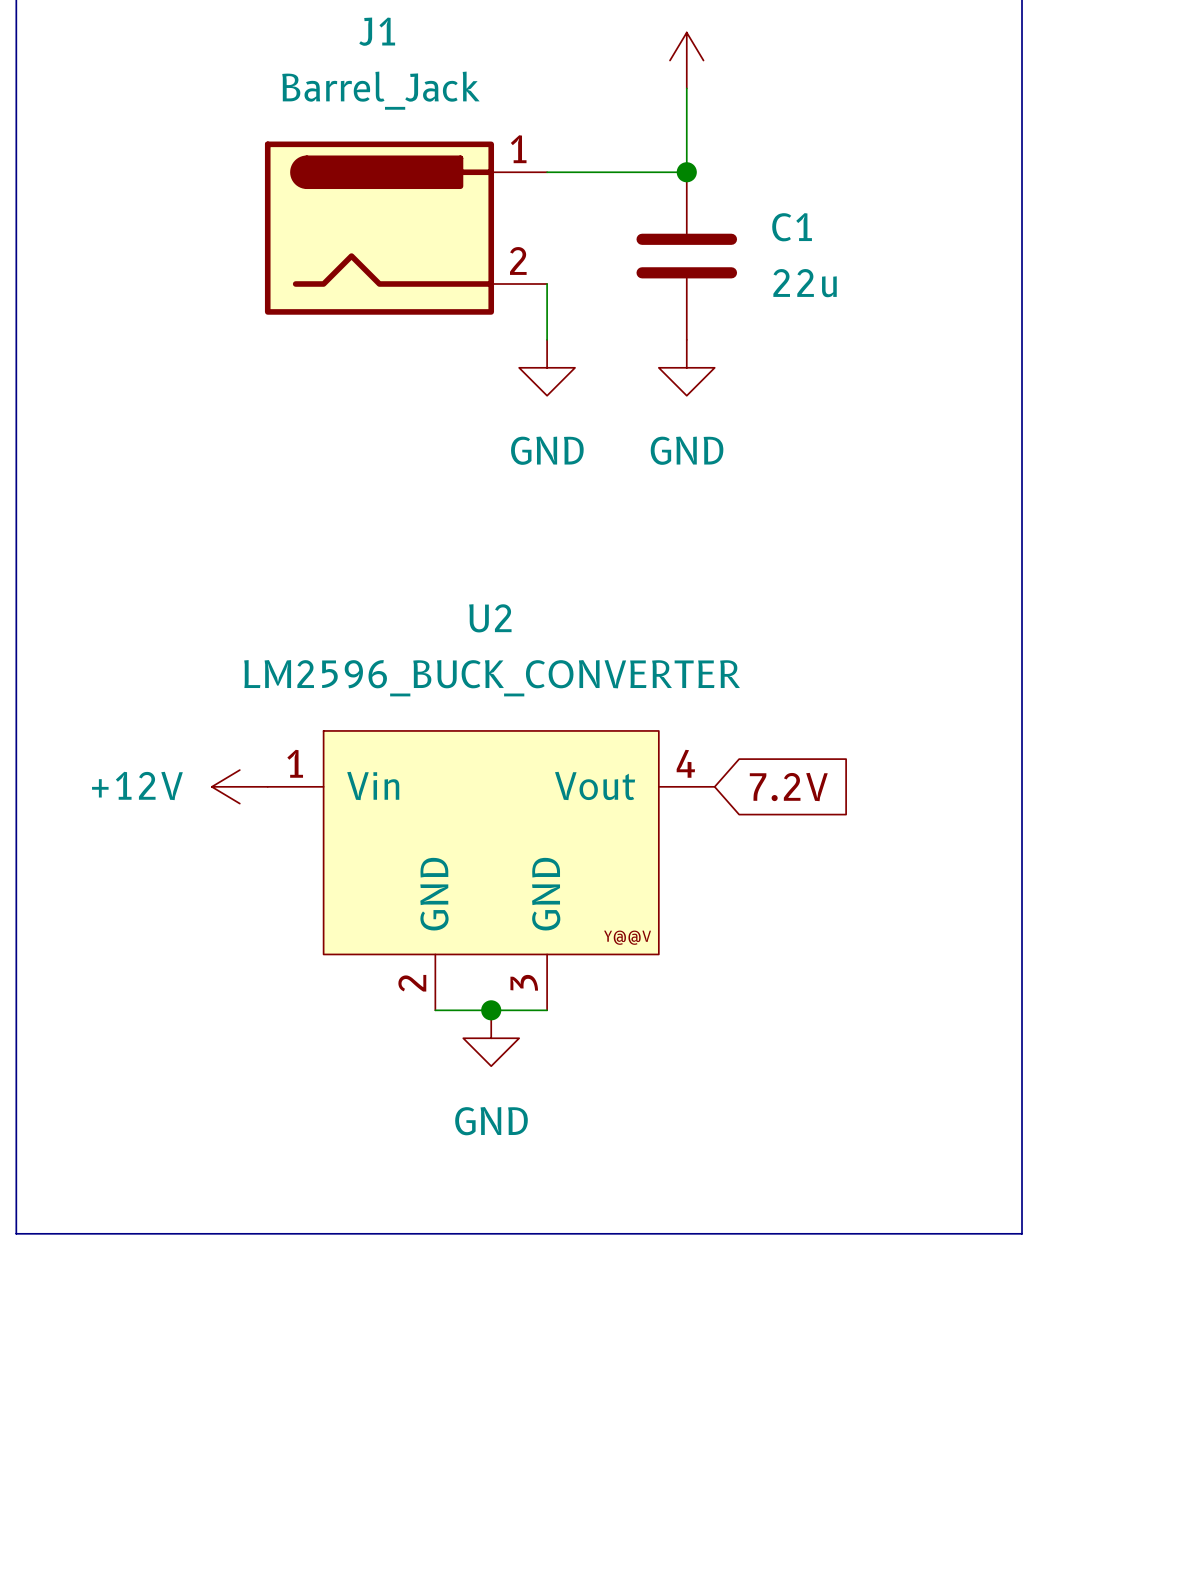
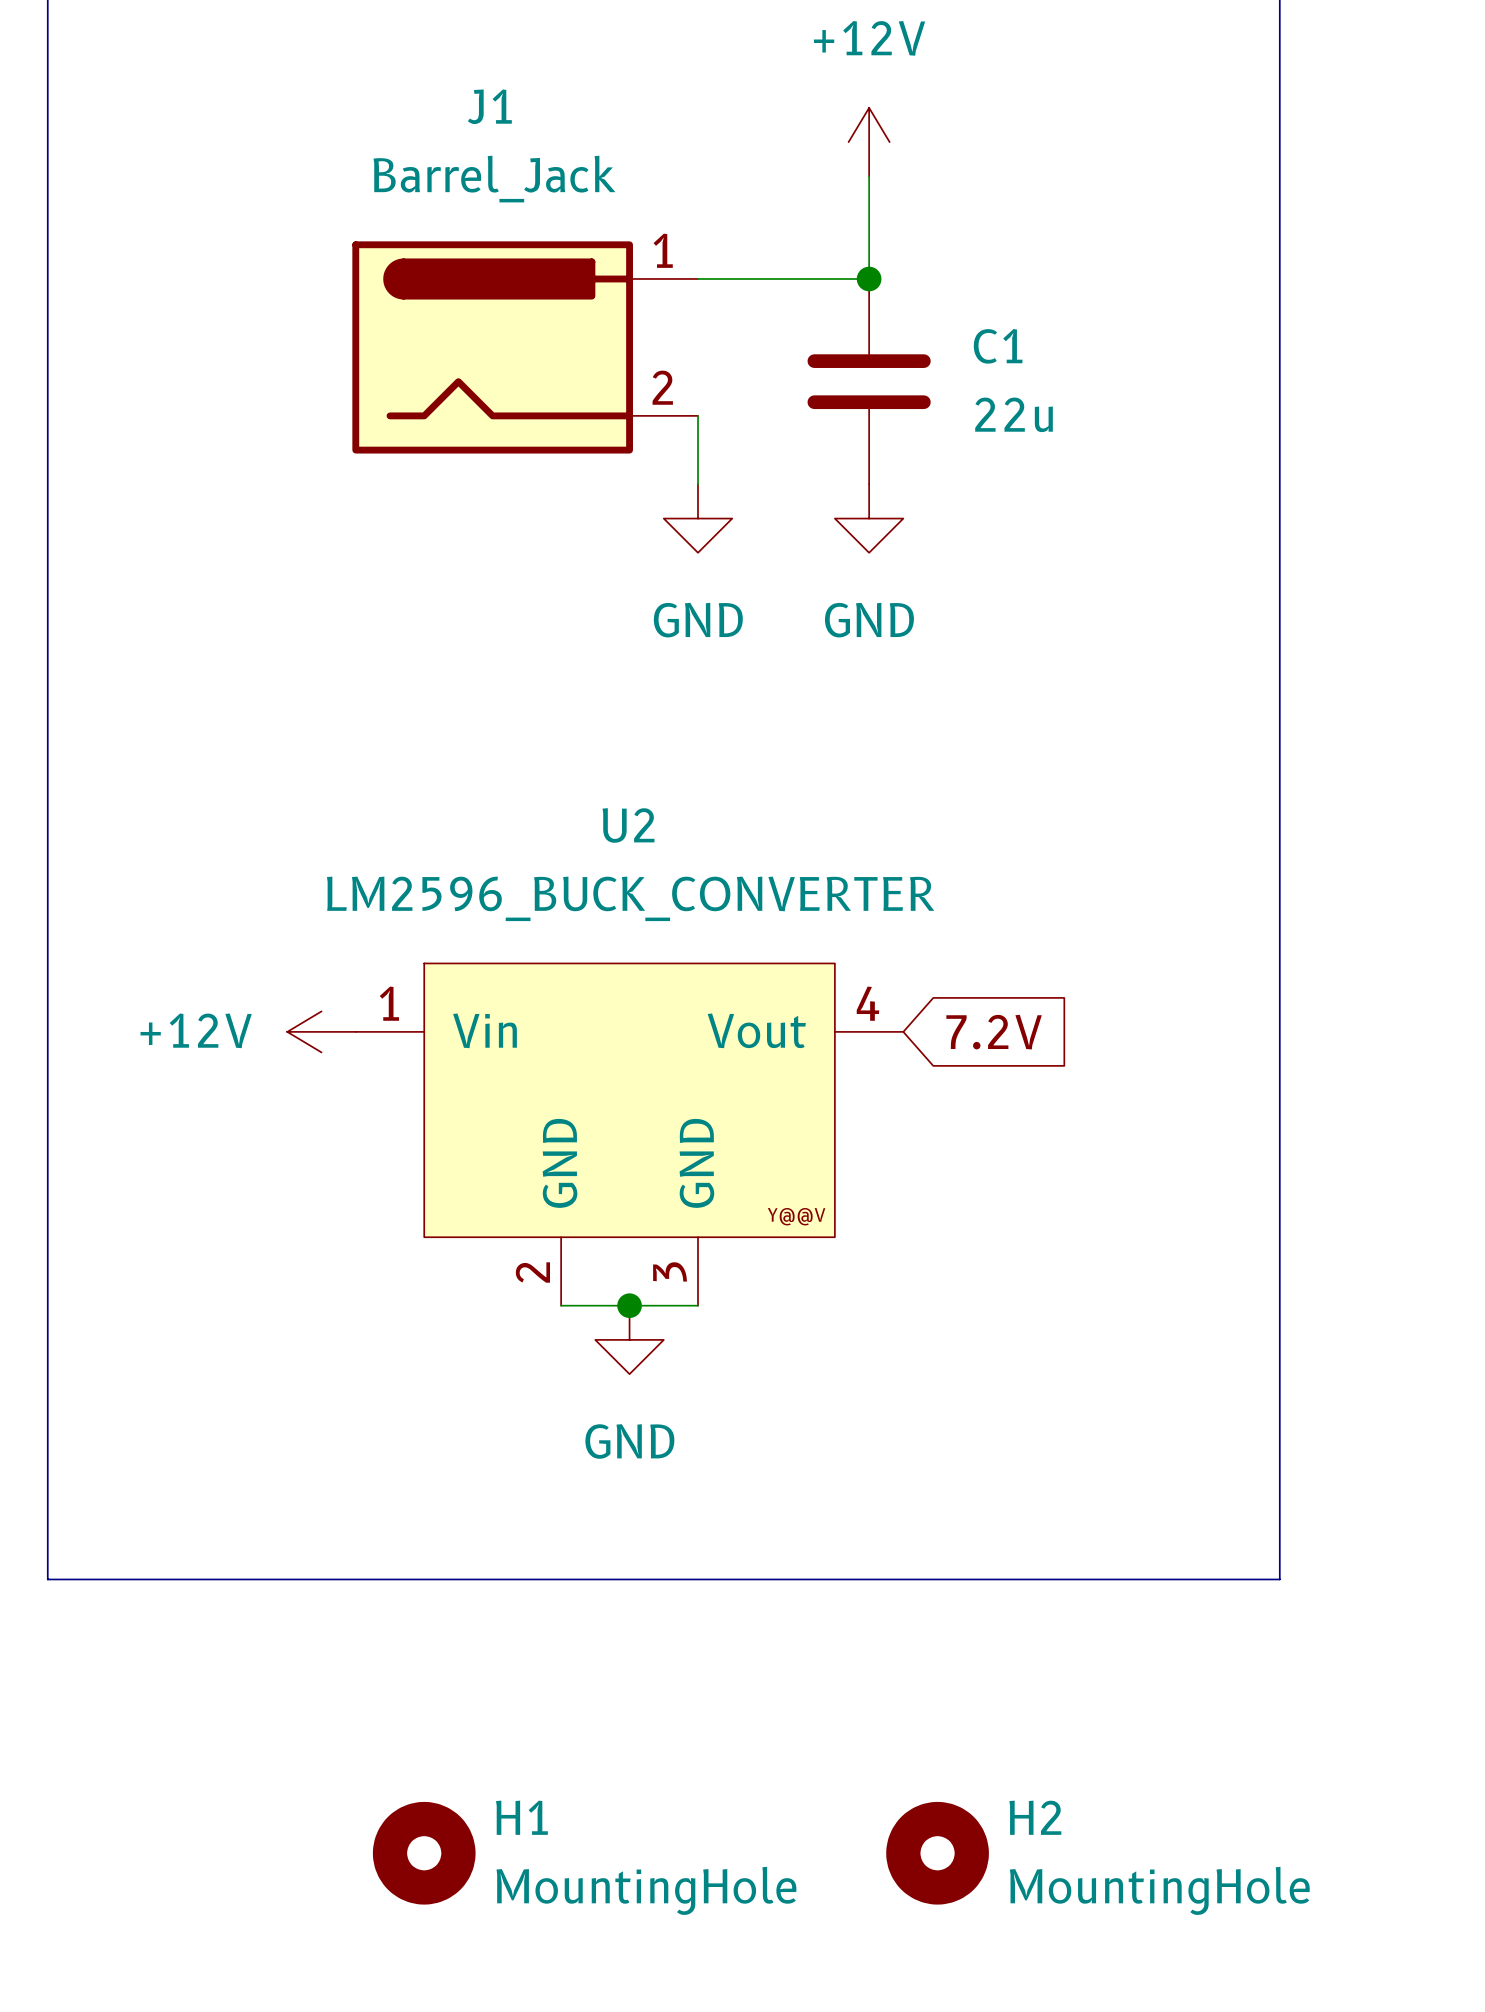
H1: none -> MountingHole (424, 1853)
H2: none -> MountingHole (937, 1853)

